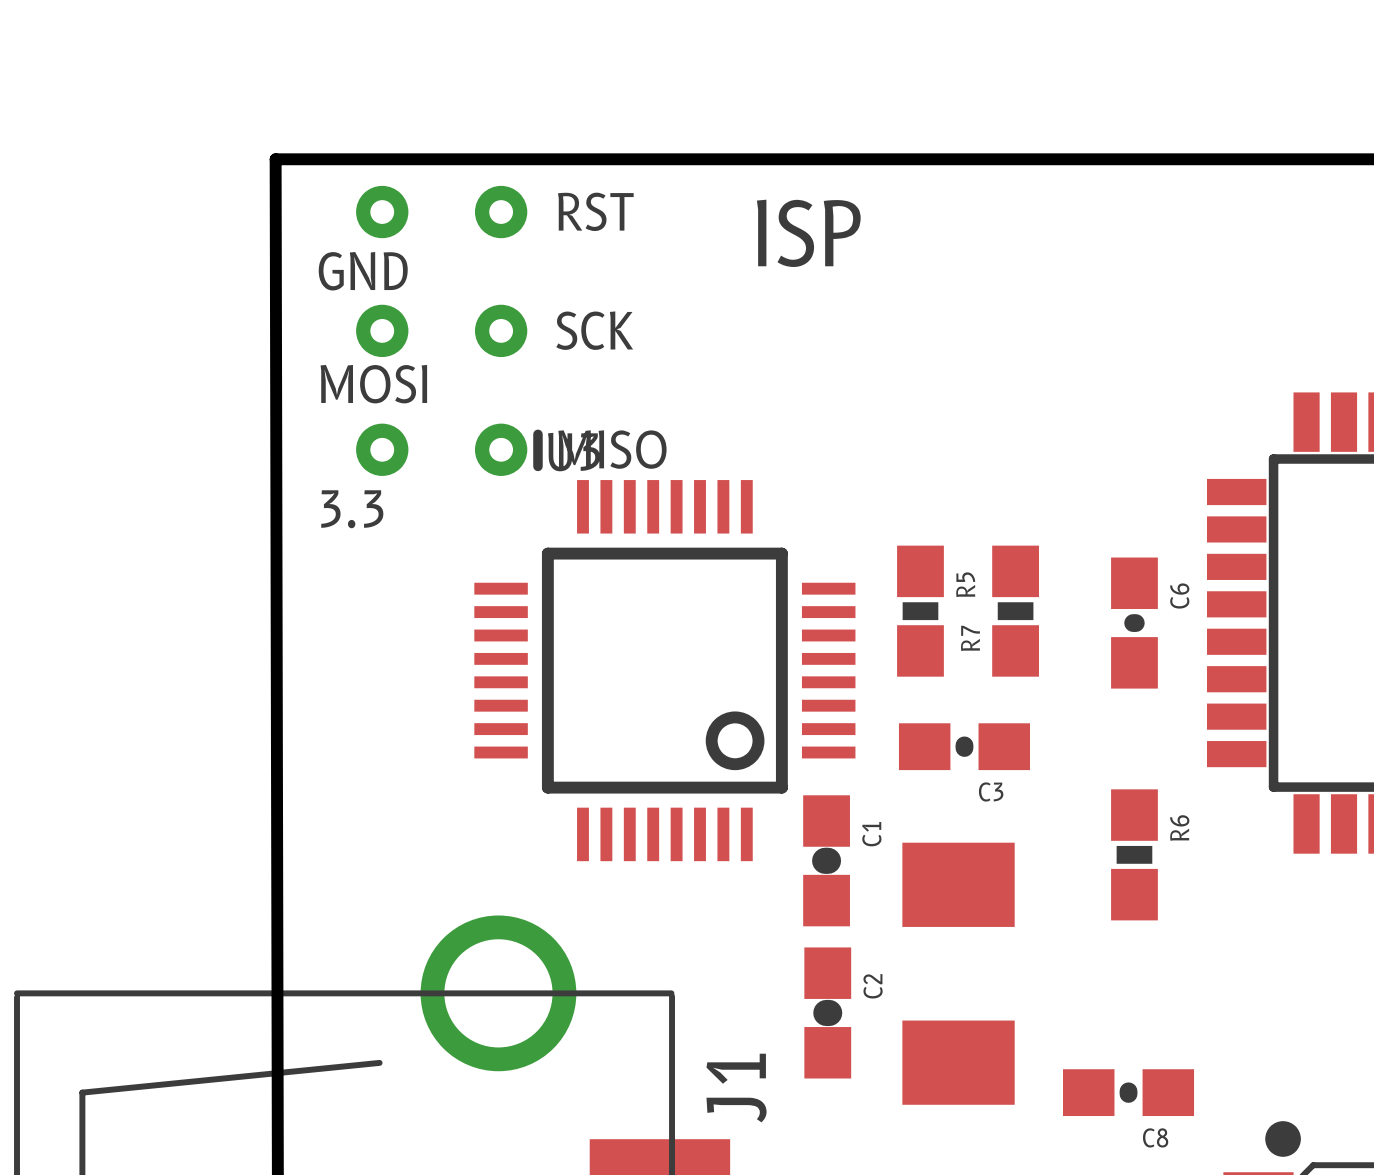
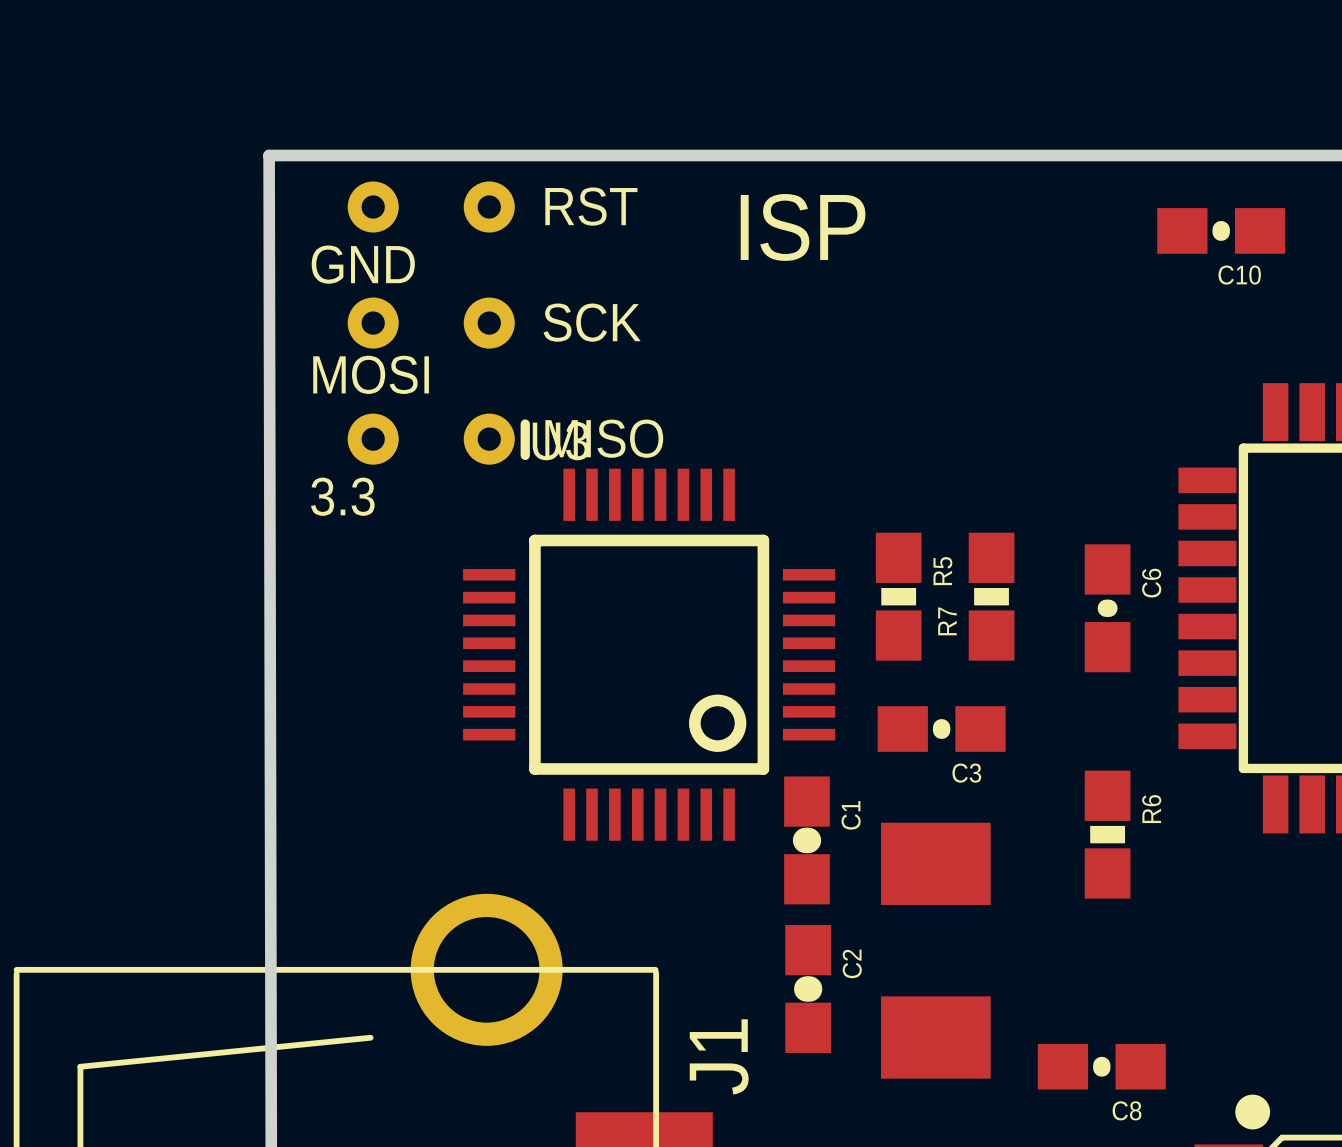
C10: none -> (1221, 230)

